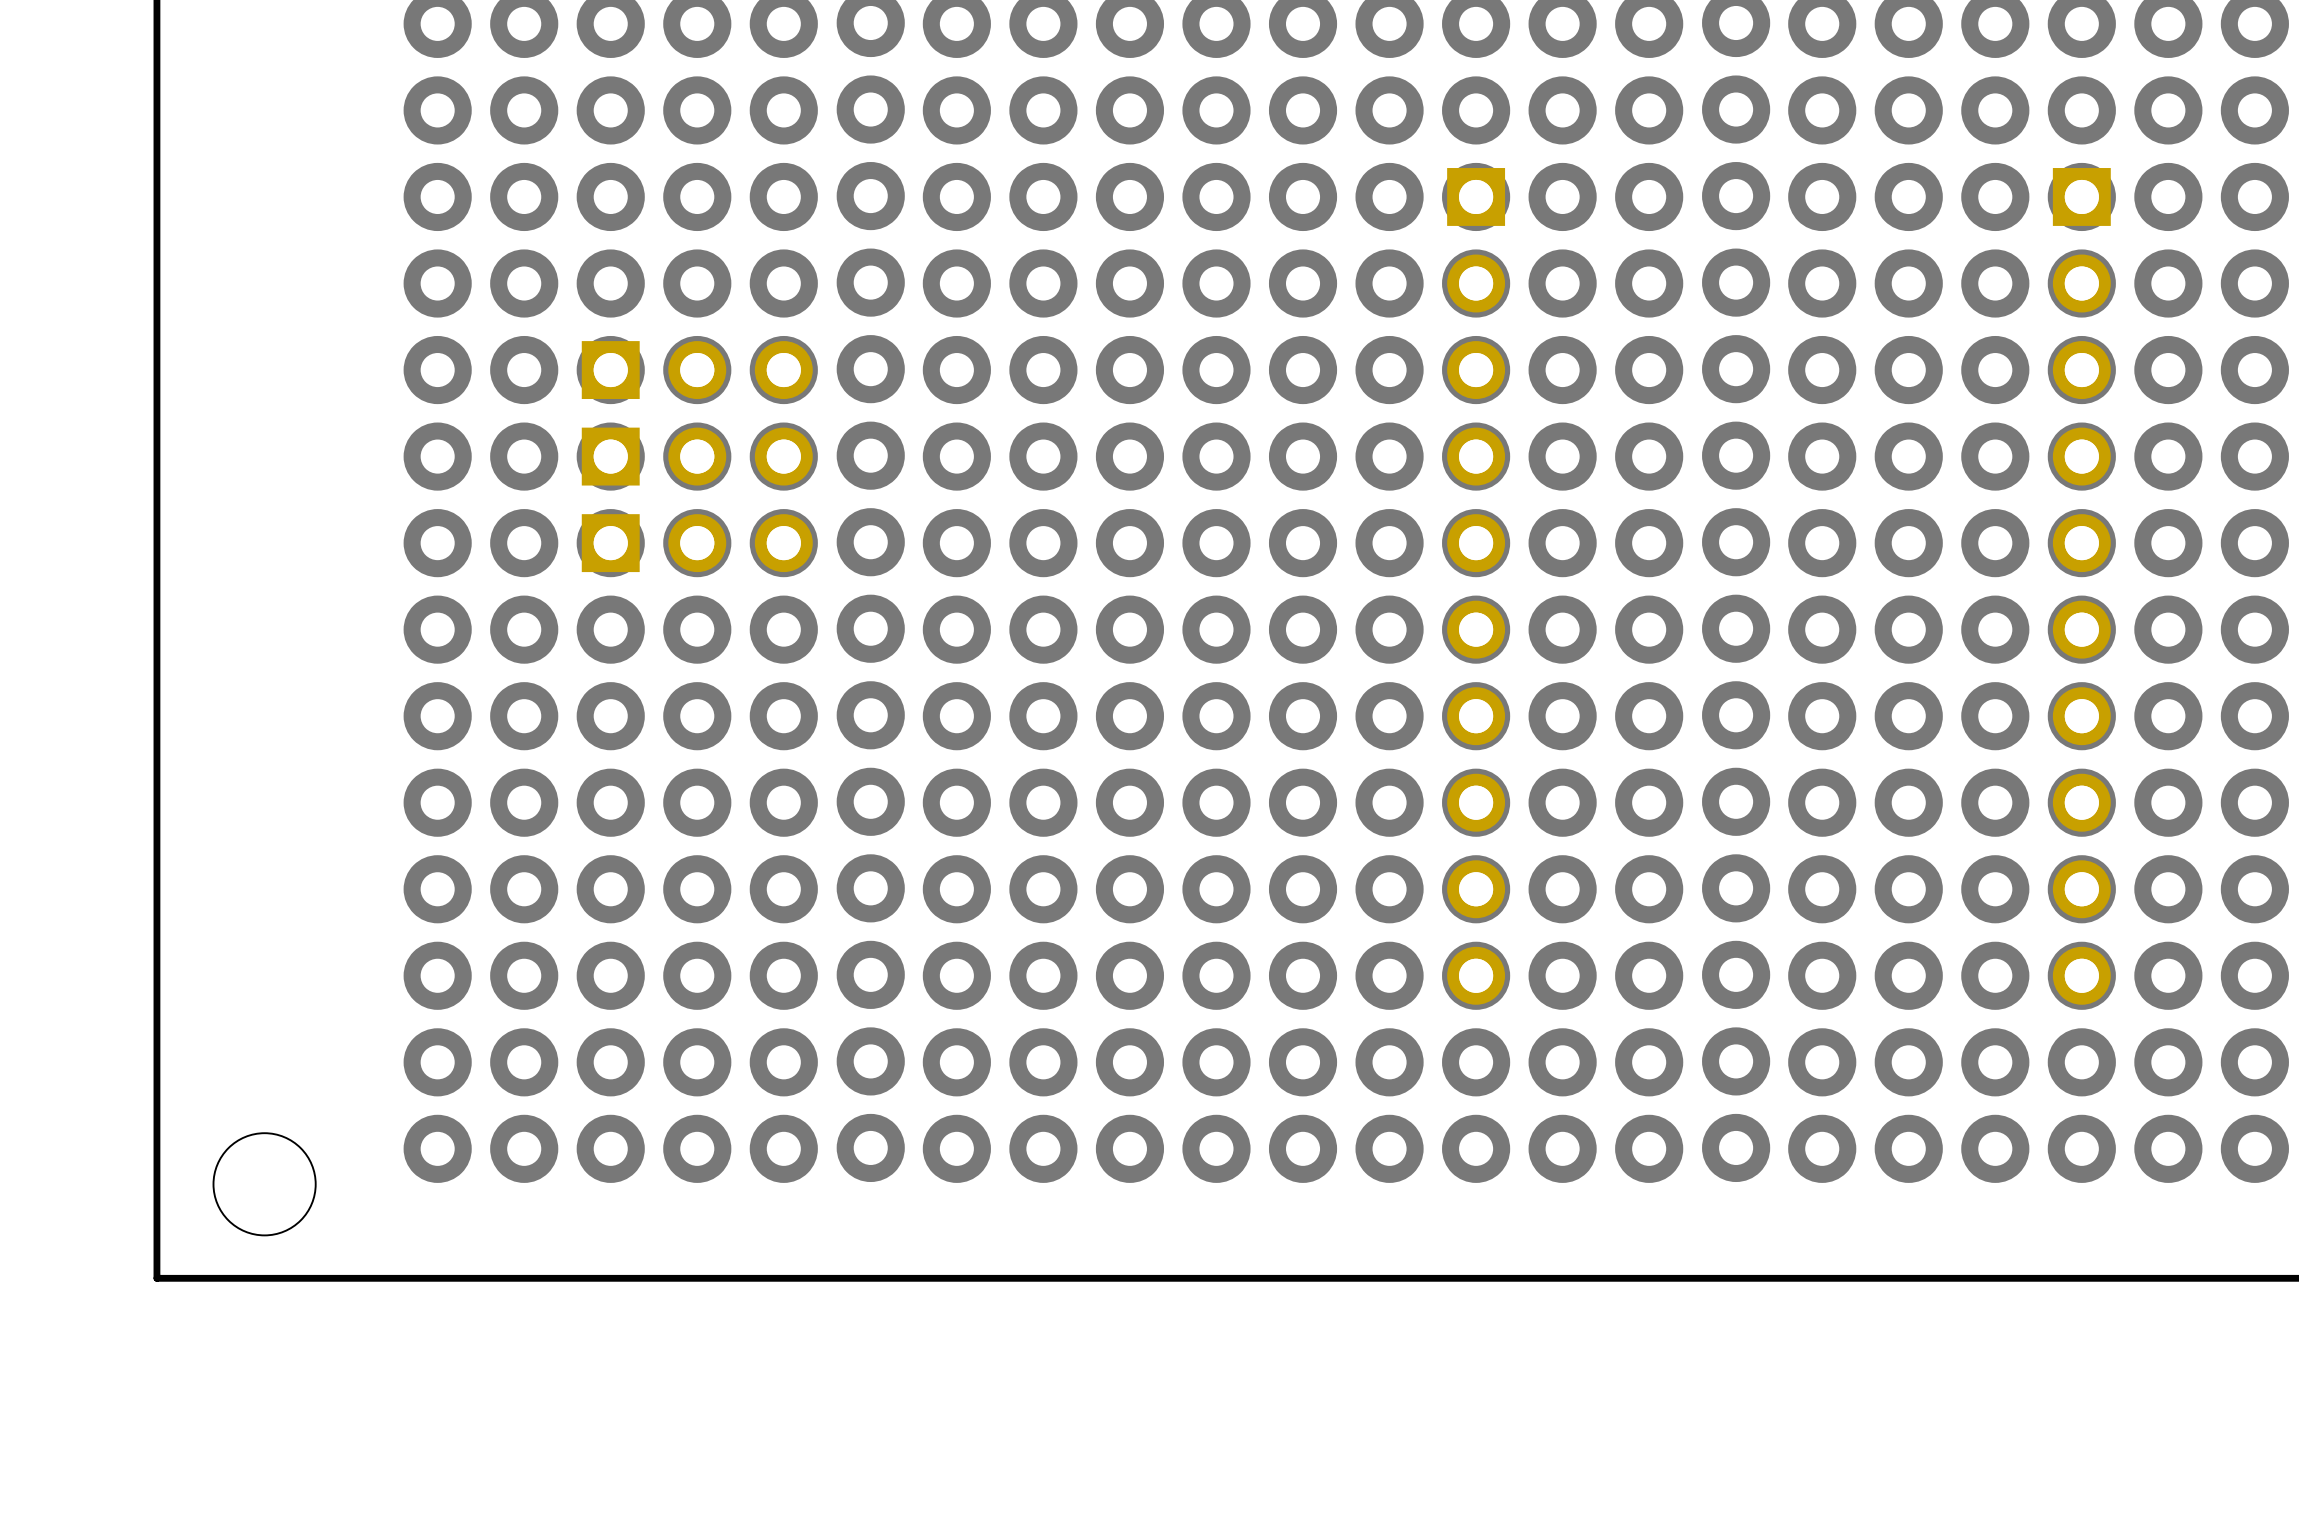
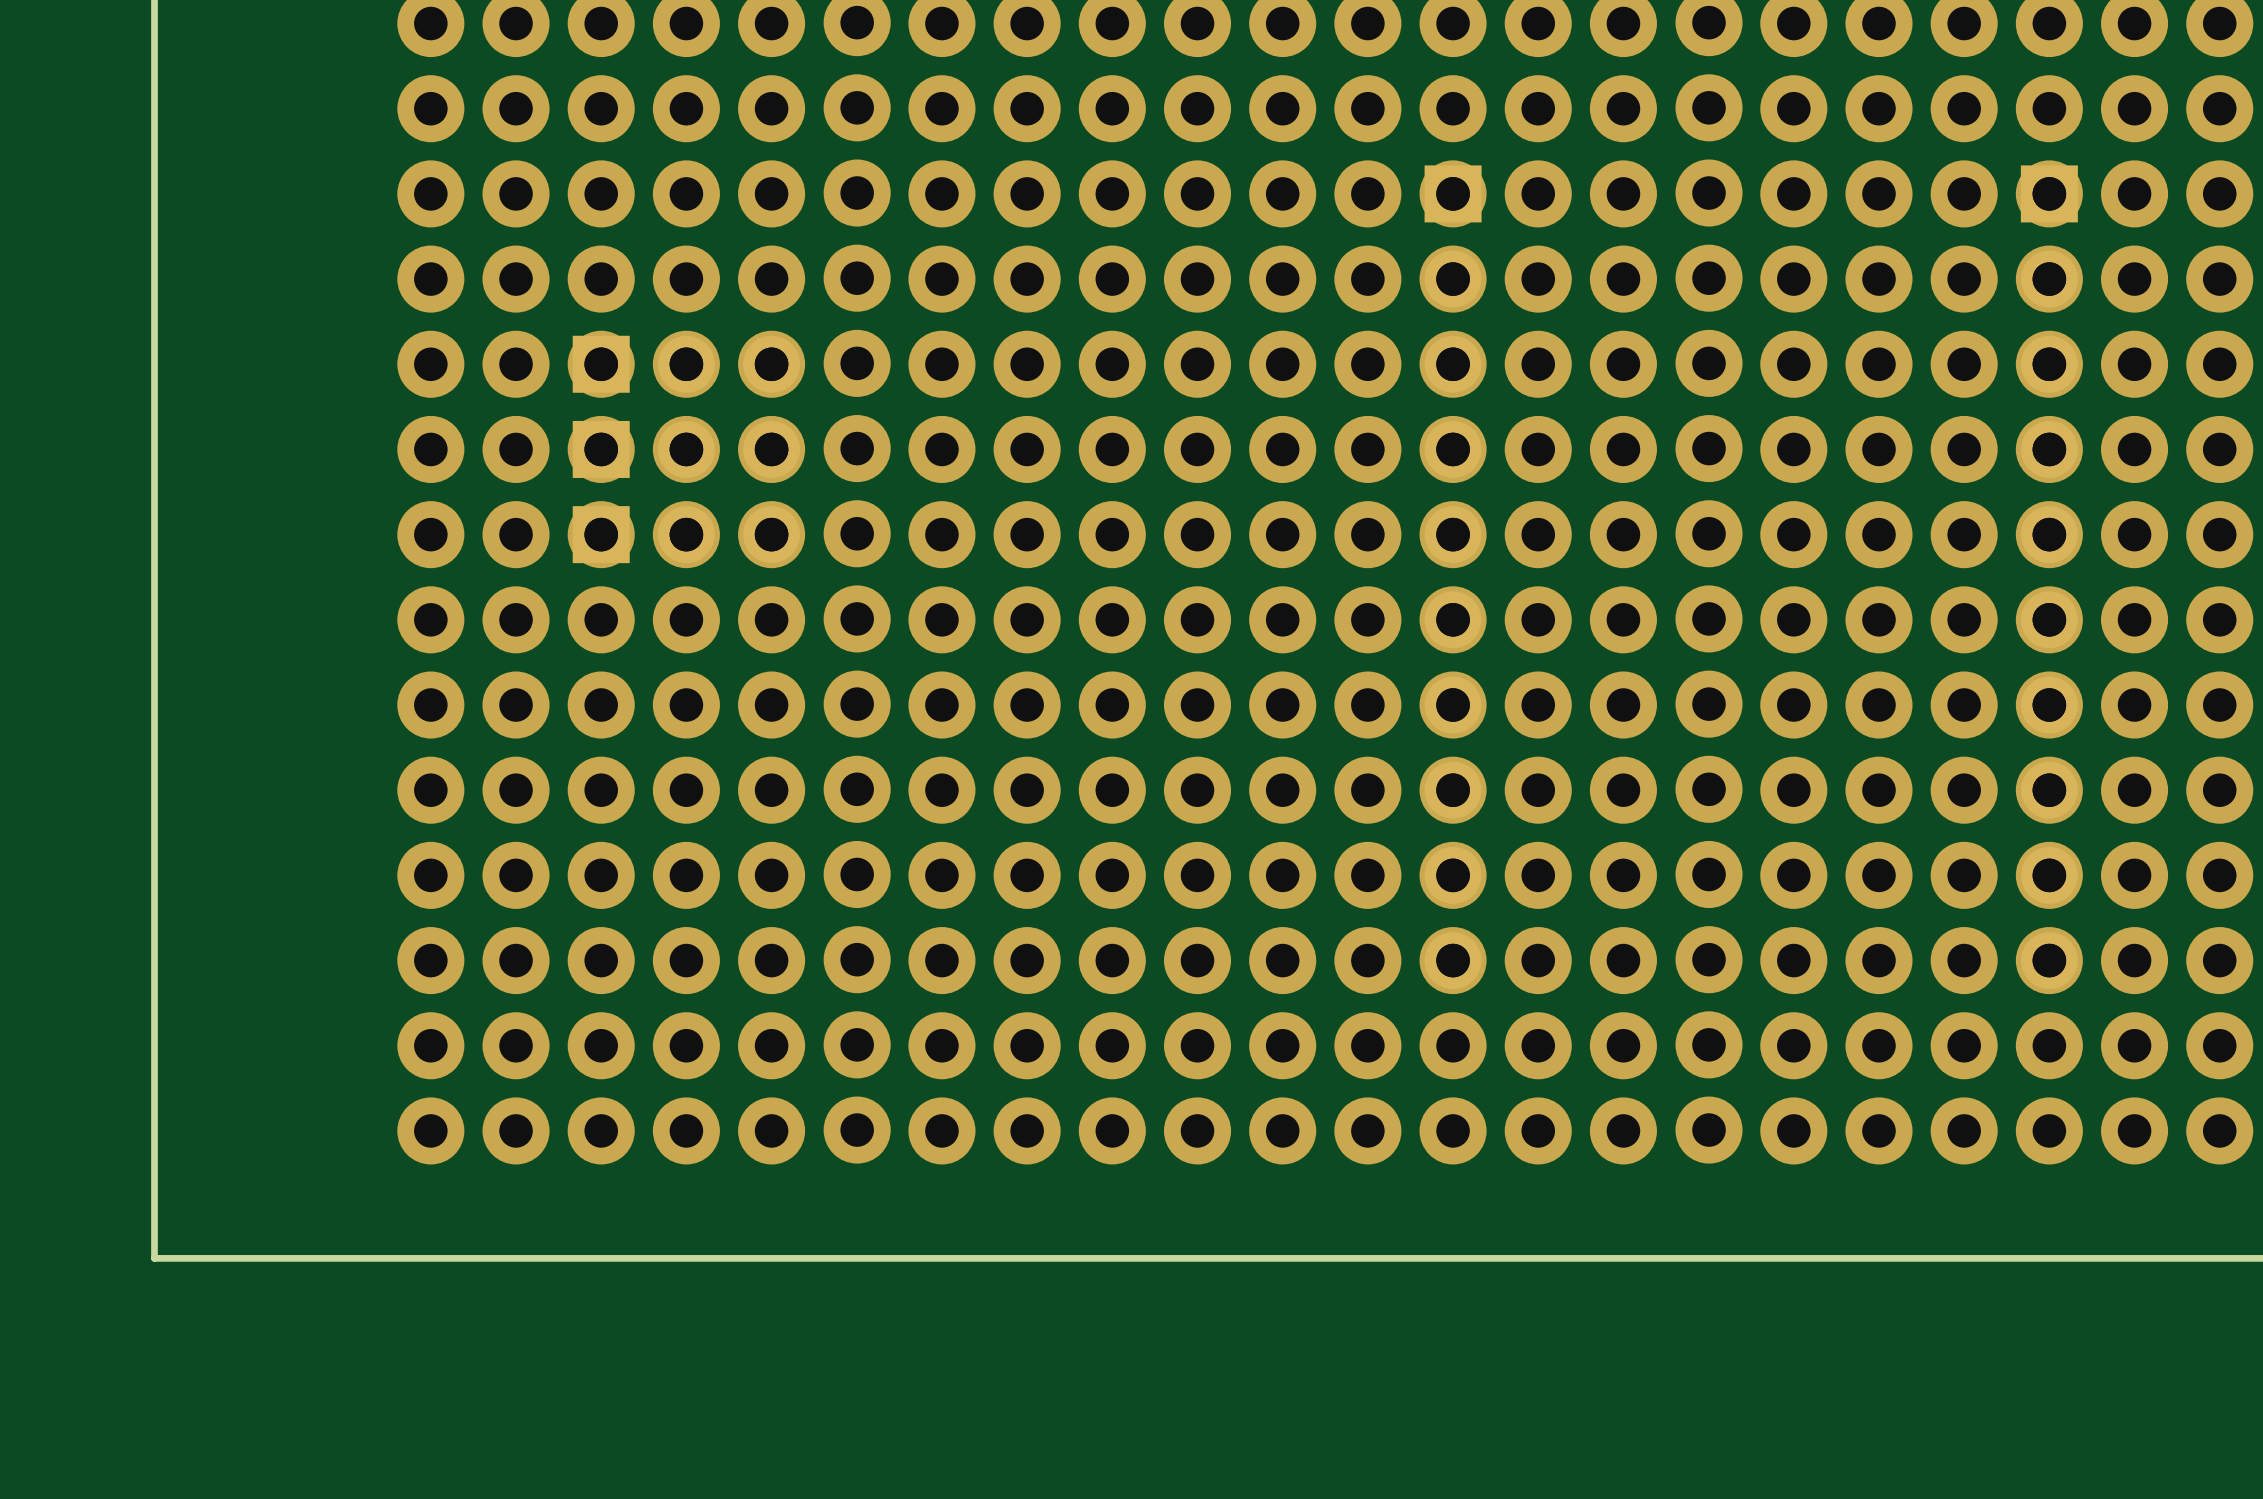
round board edge: [212, 1132, 317, 1237] -> none

